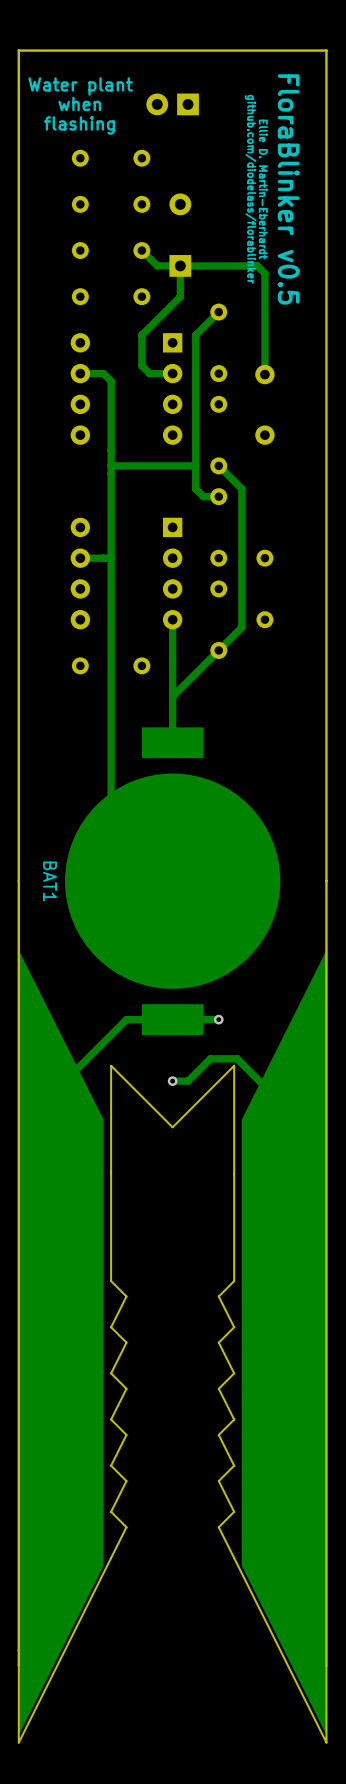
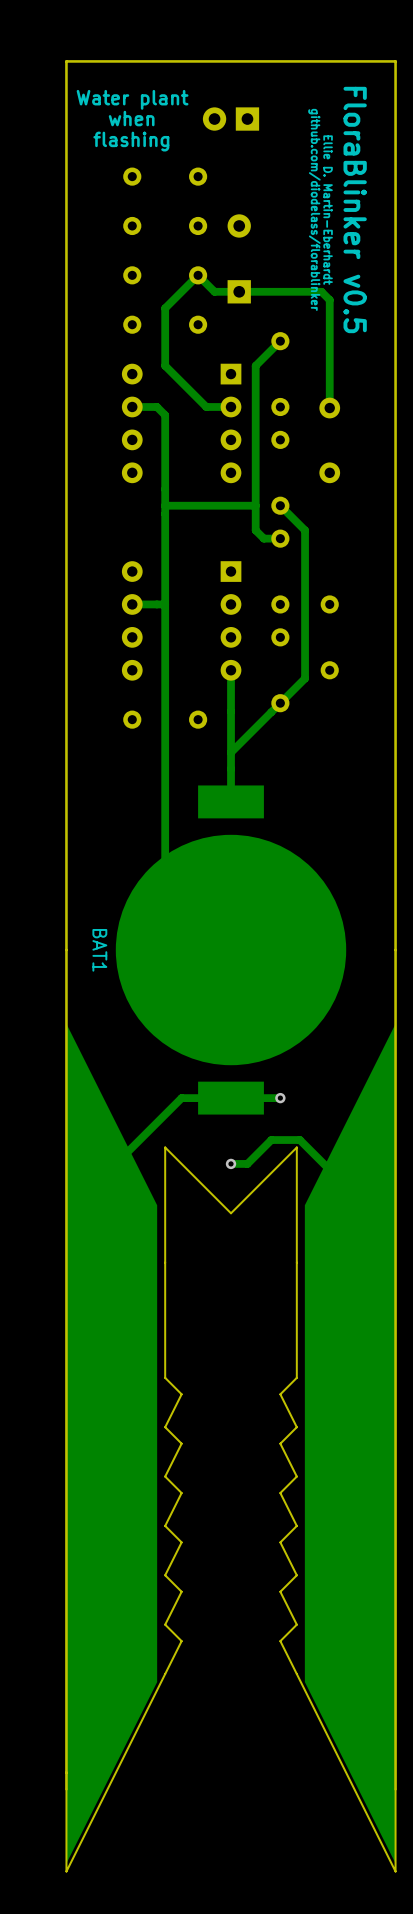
track: (180, 265) (180, 296) (141, 335) (141, 365) -> (198, 275) (165, 308) (165, 365) (198, 398)

